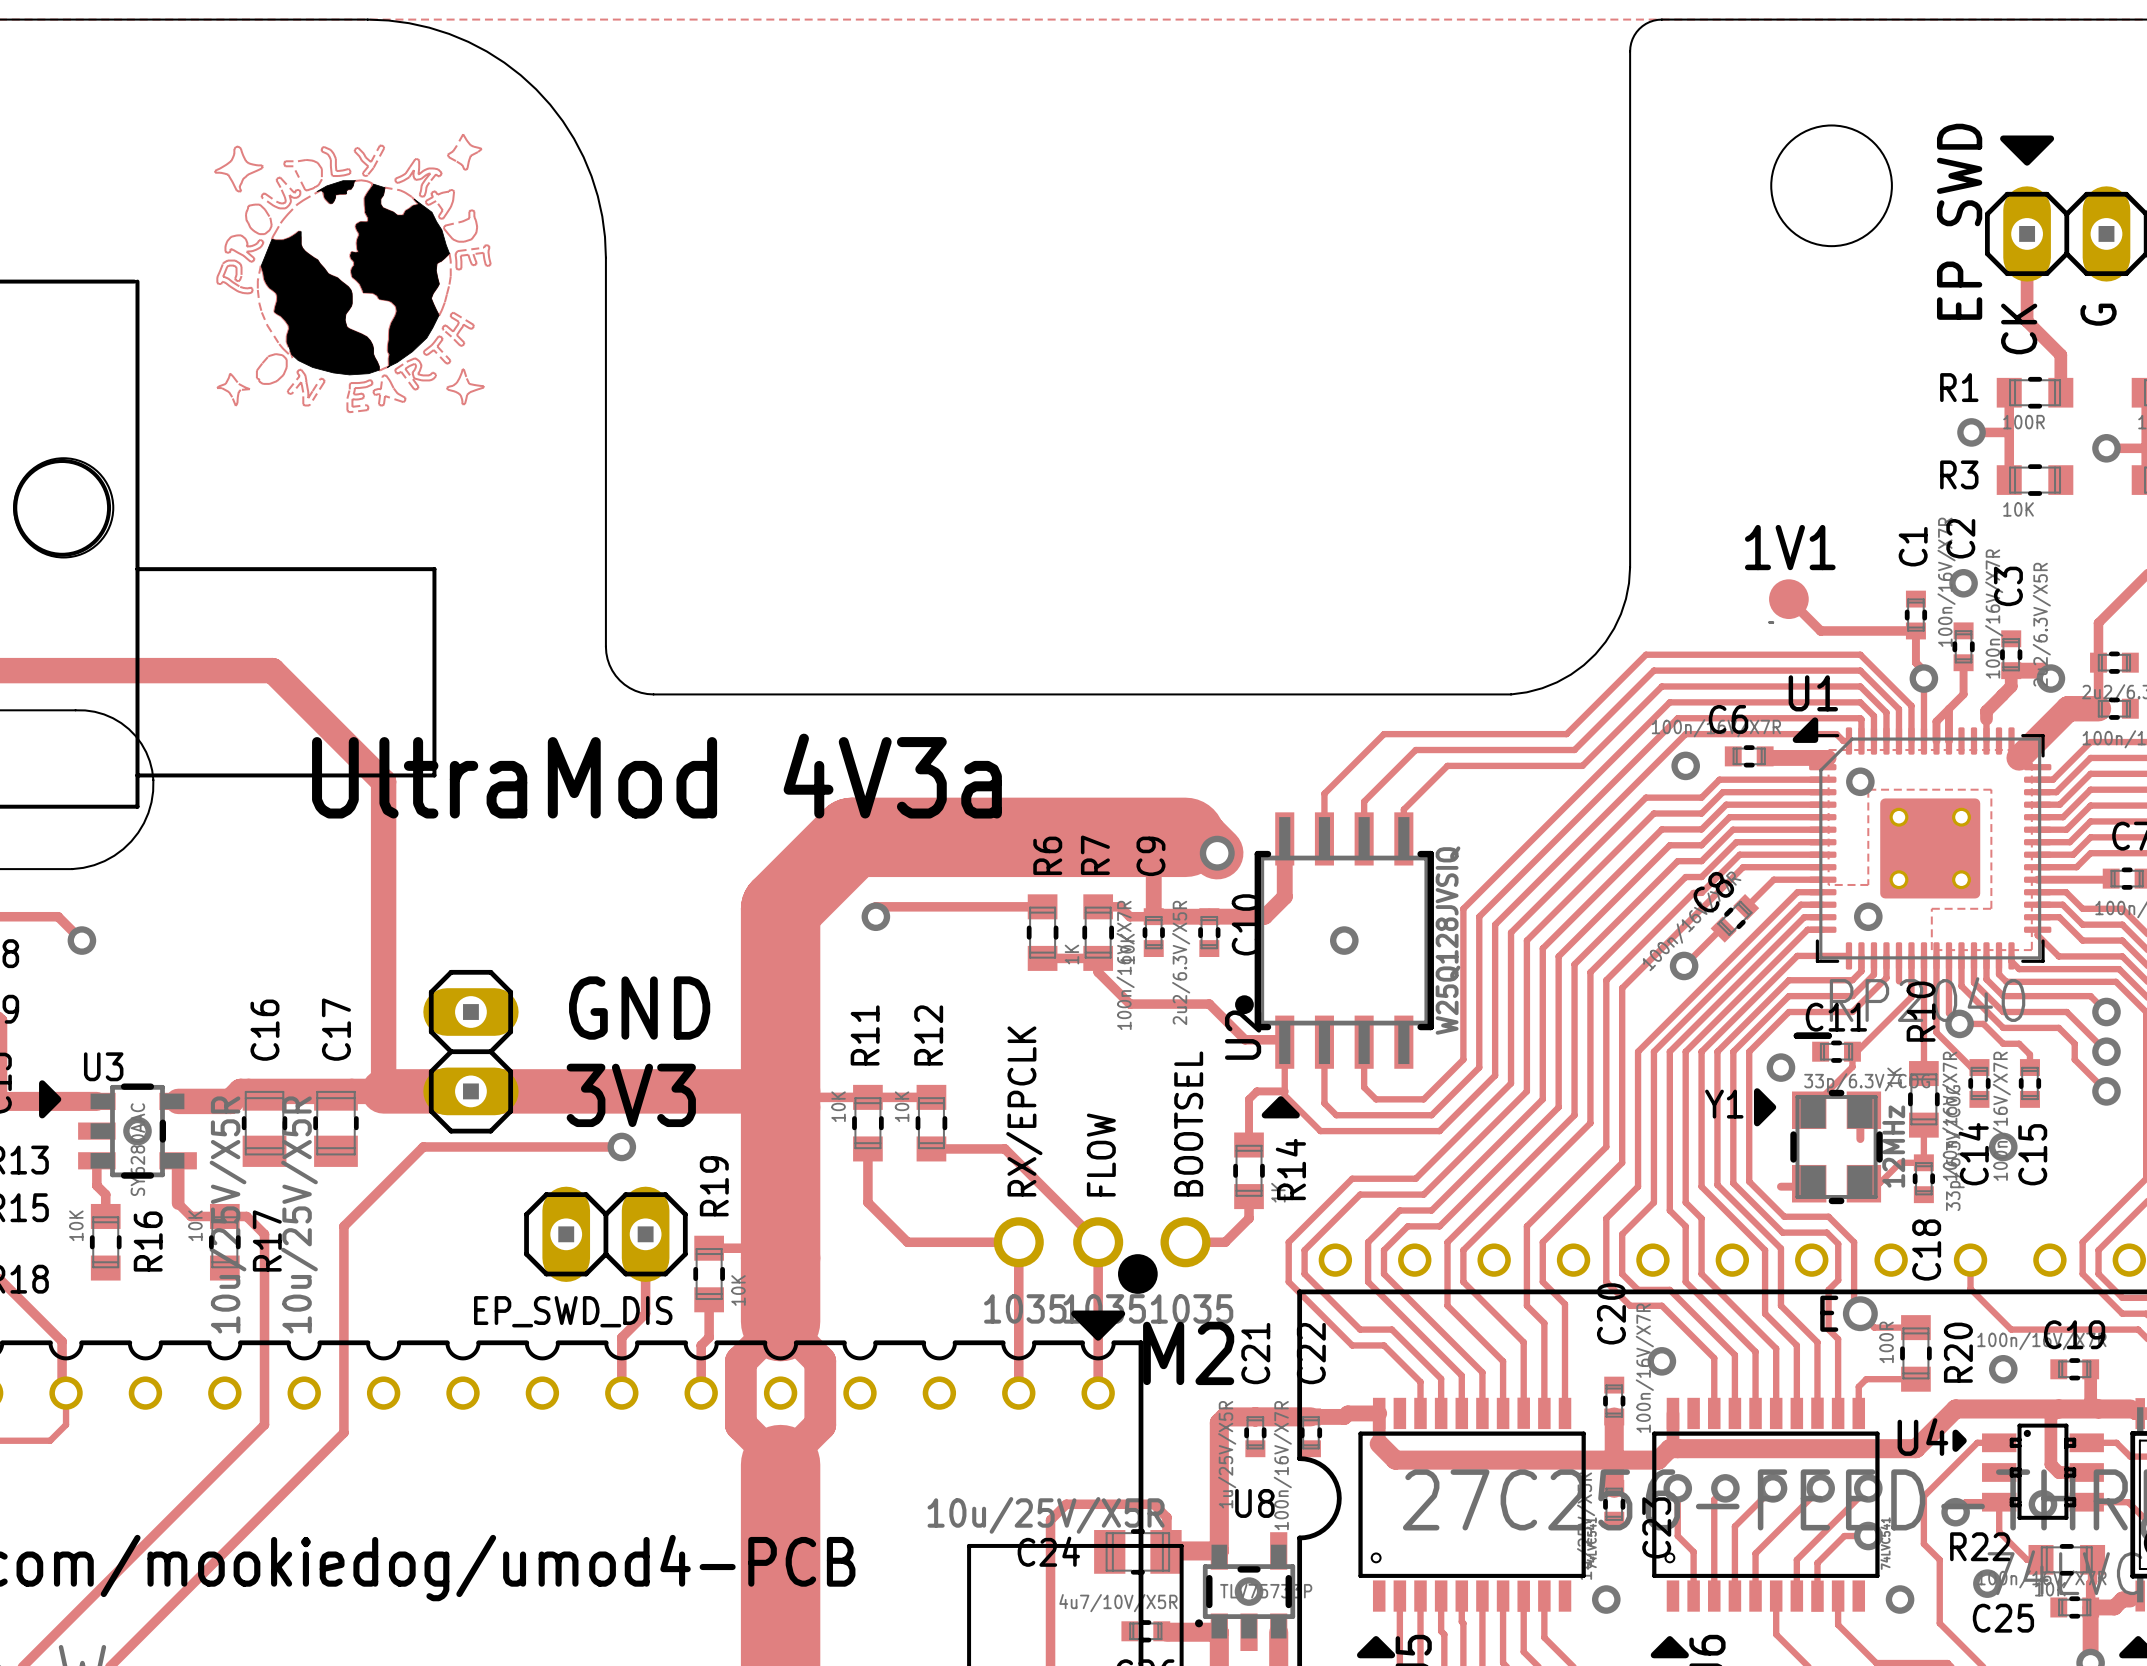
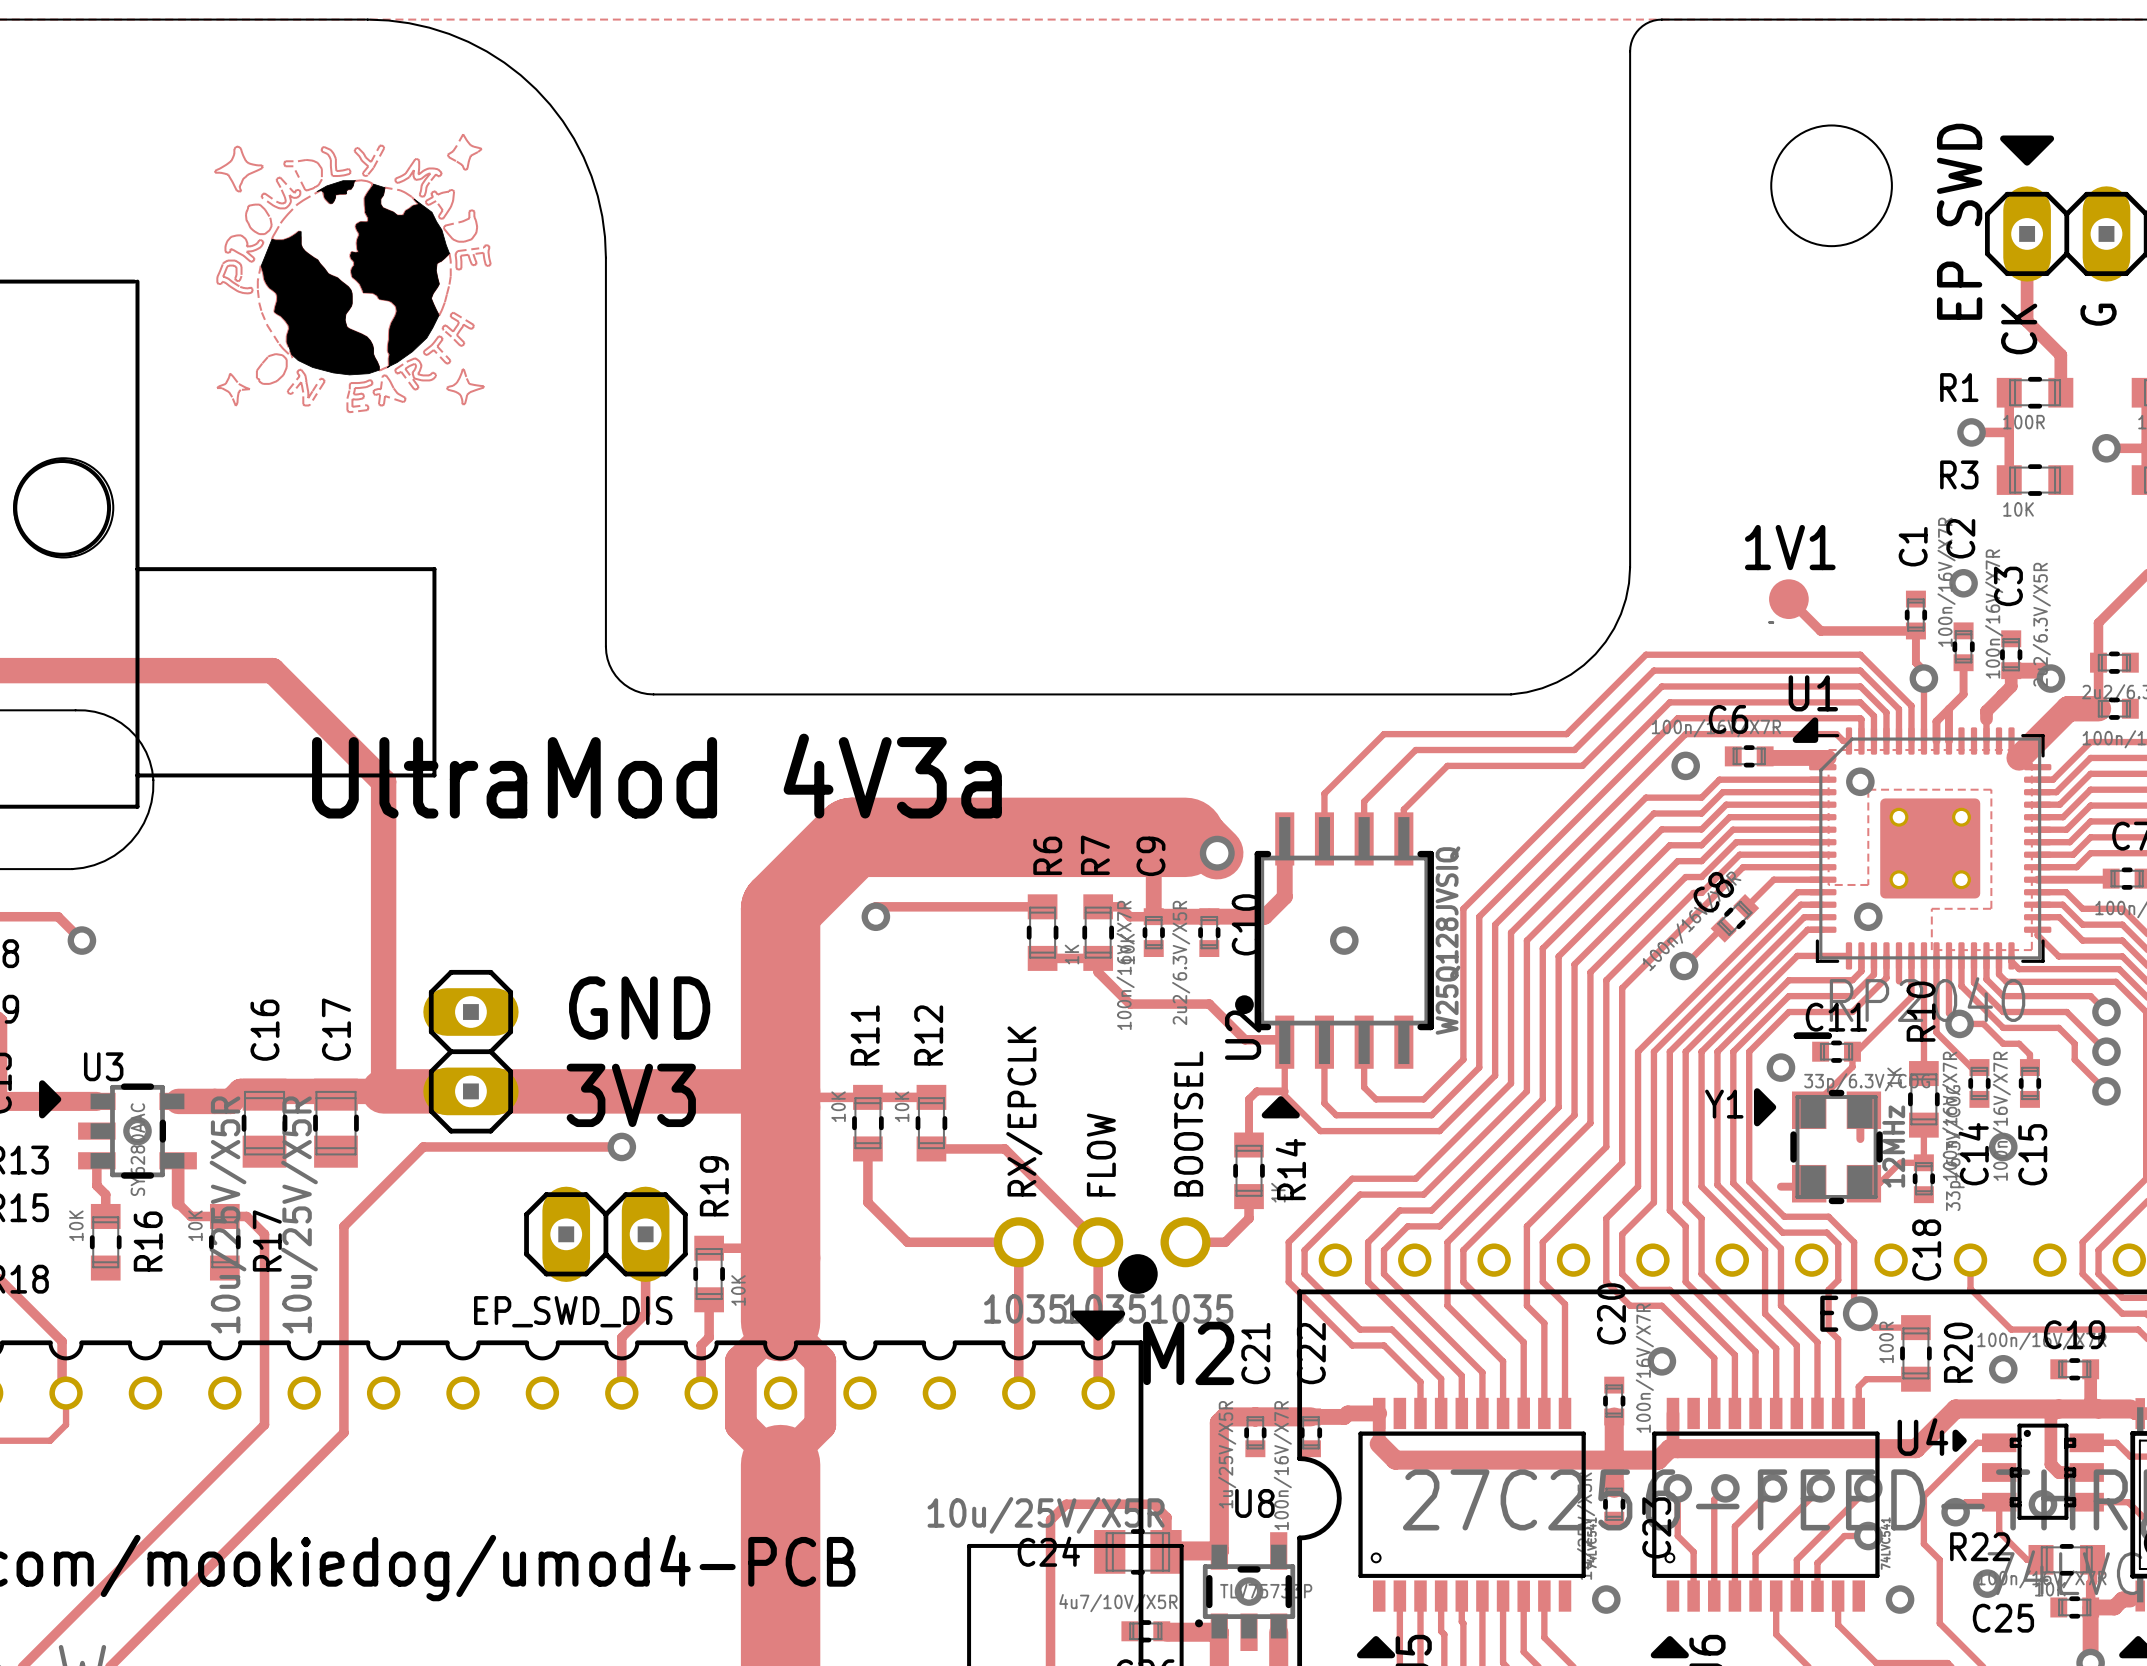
C16 footprint: [241, 1079, 288, 1167] -> [241, 1078, 288, 1168]
C17 footprint: [313, 1079, 359, 1167] -> [313, 1078, 359, 1168]

